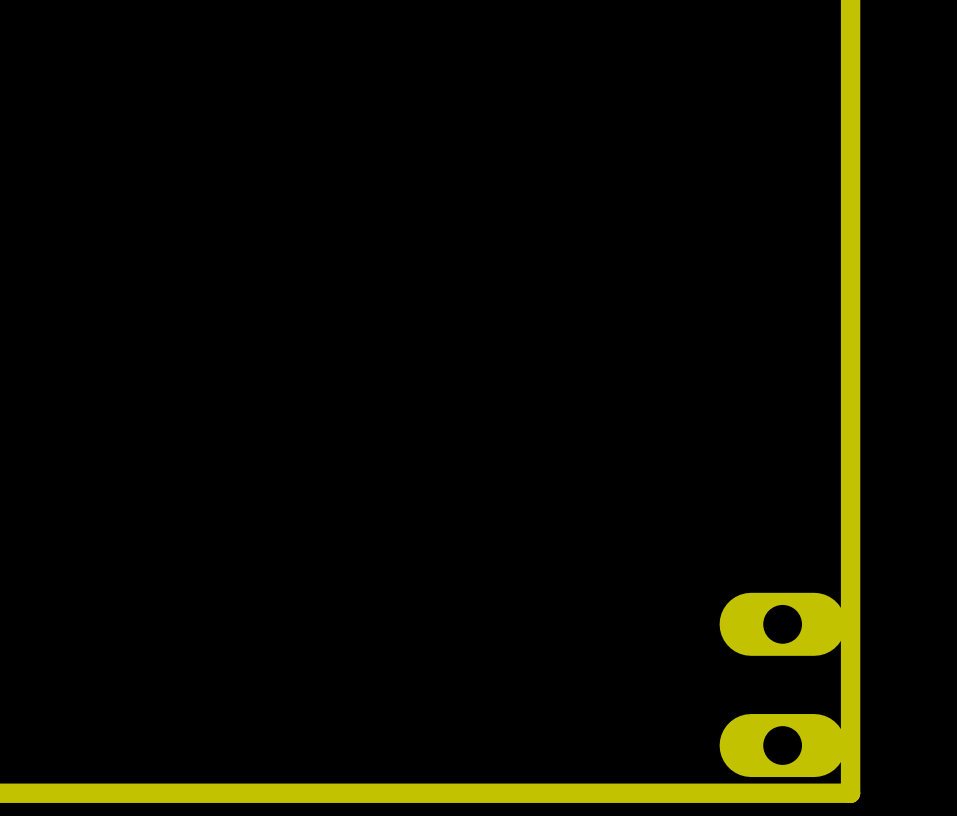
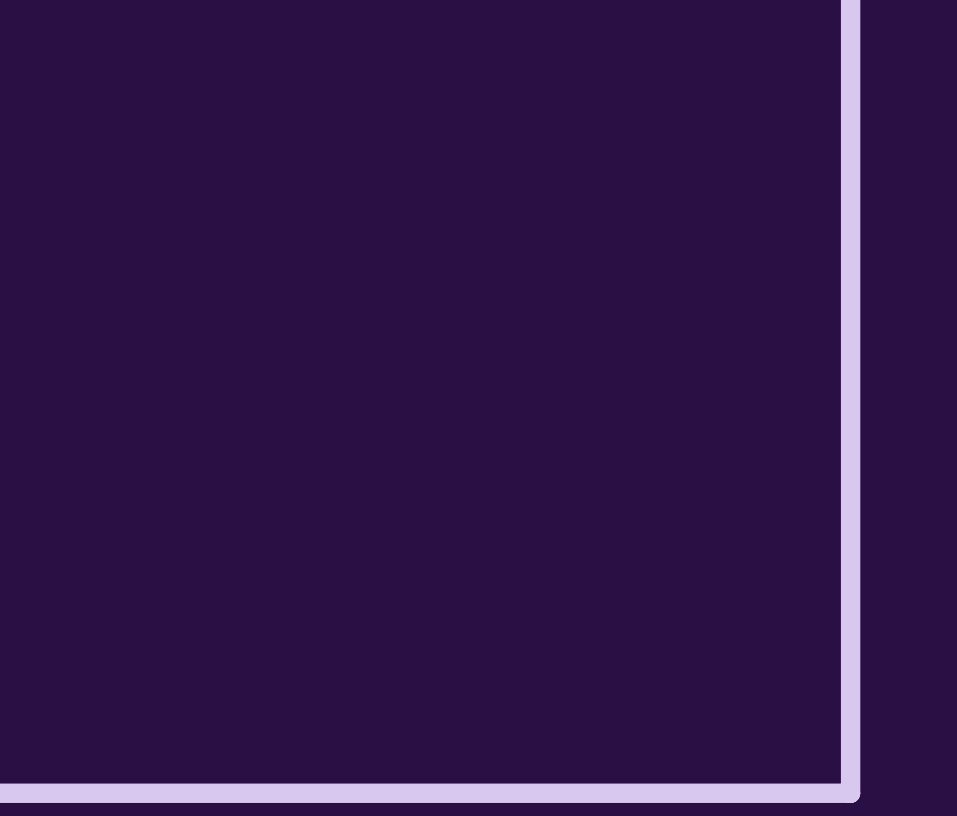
part: (782, 624) -> none
part: (782, 745) -> none

